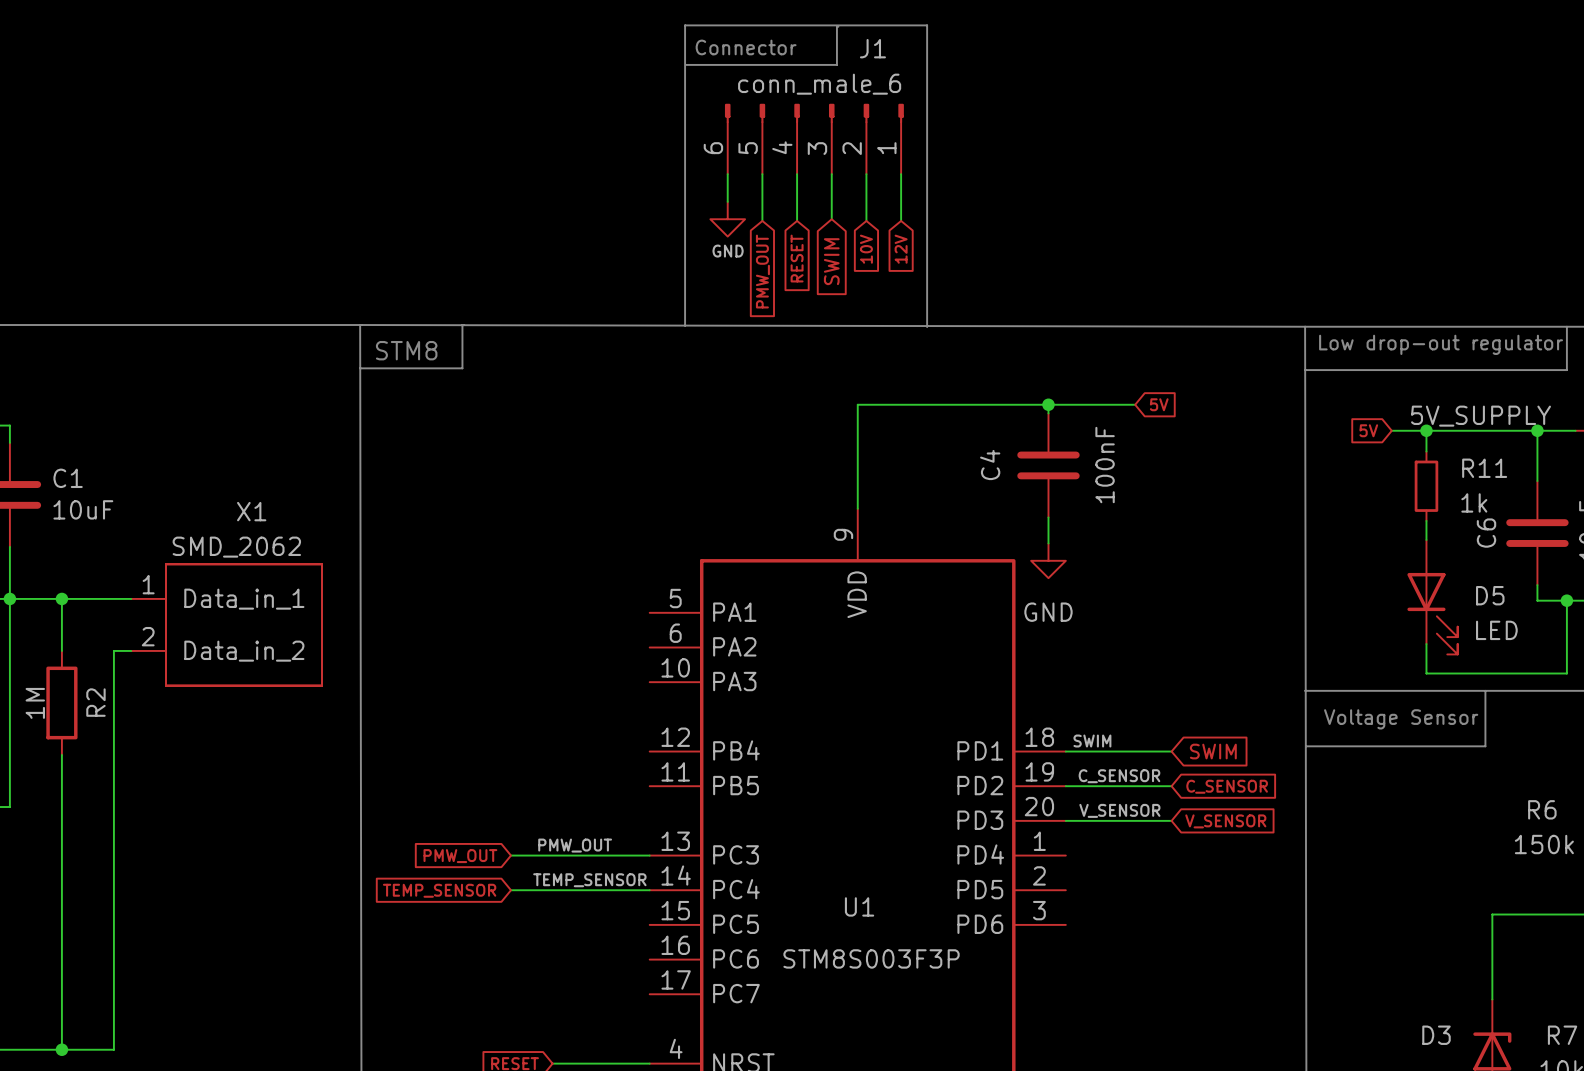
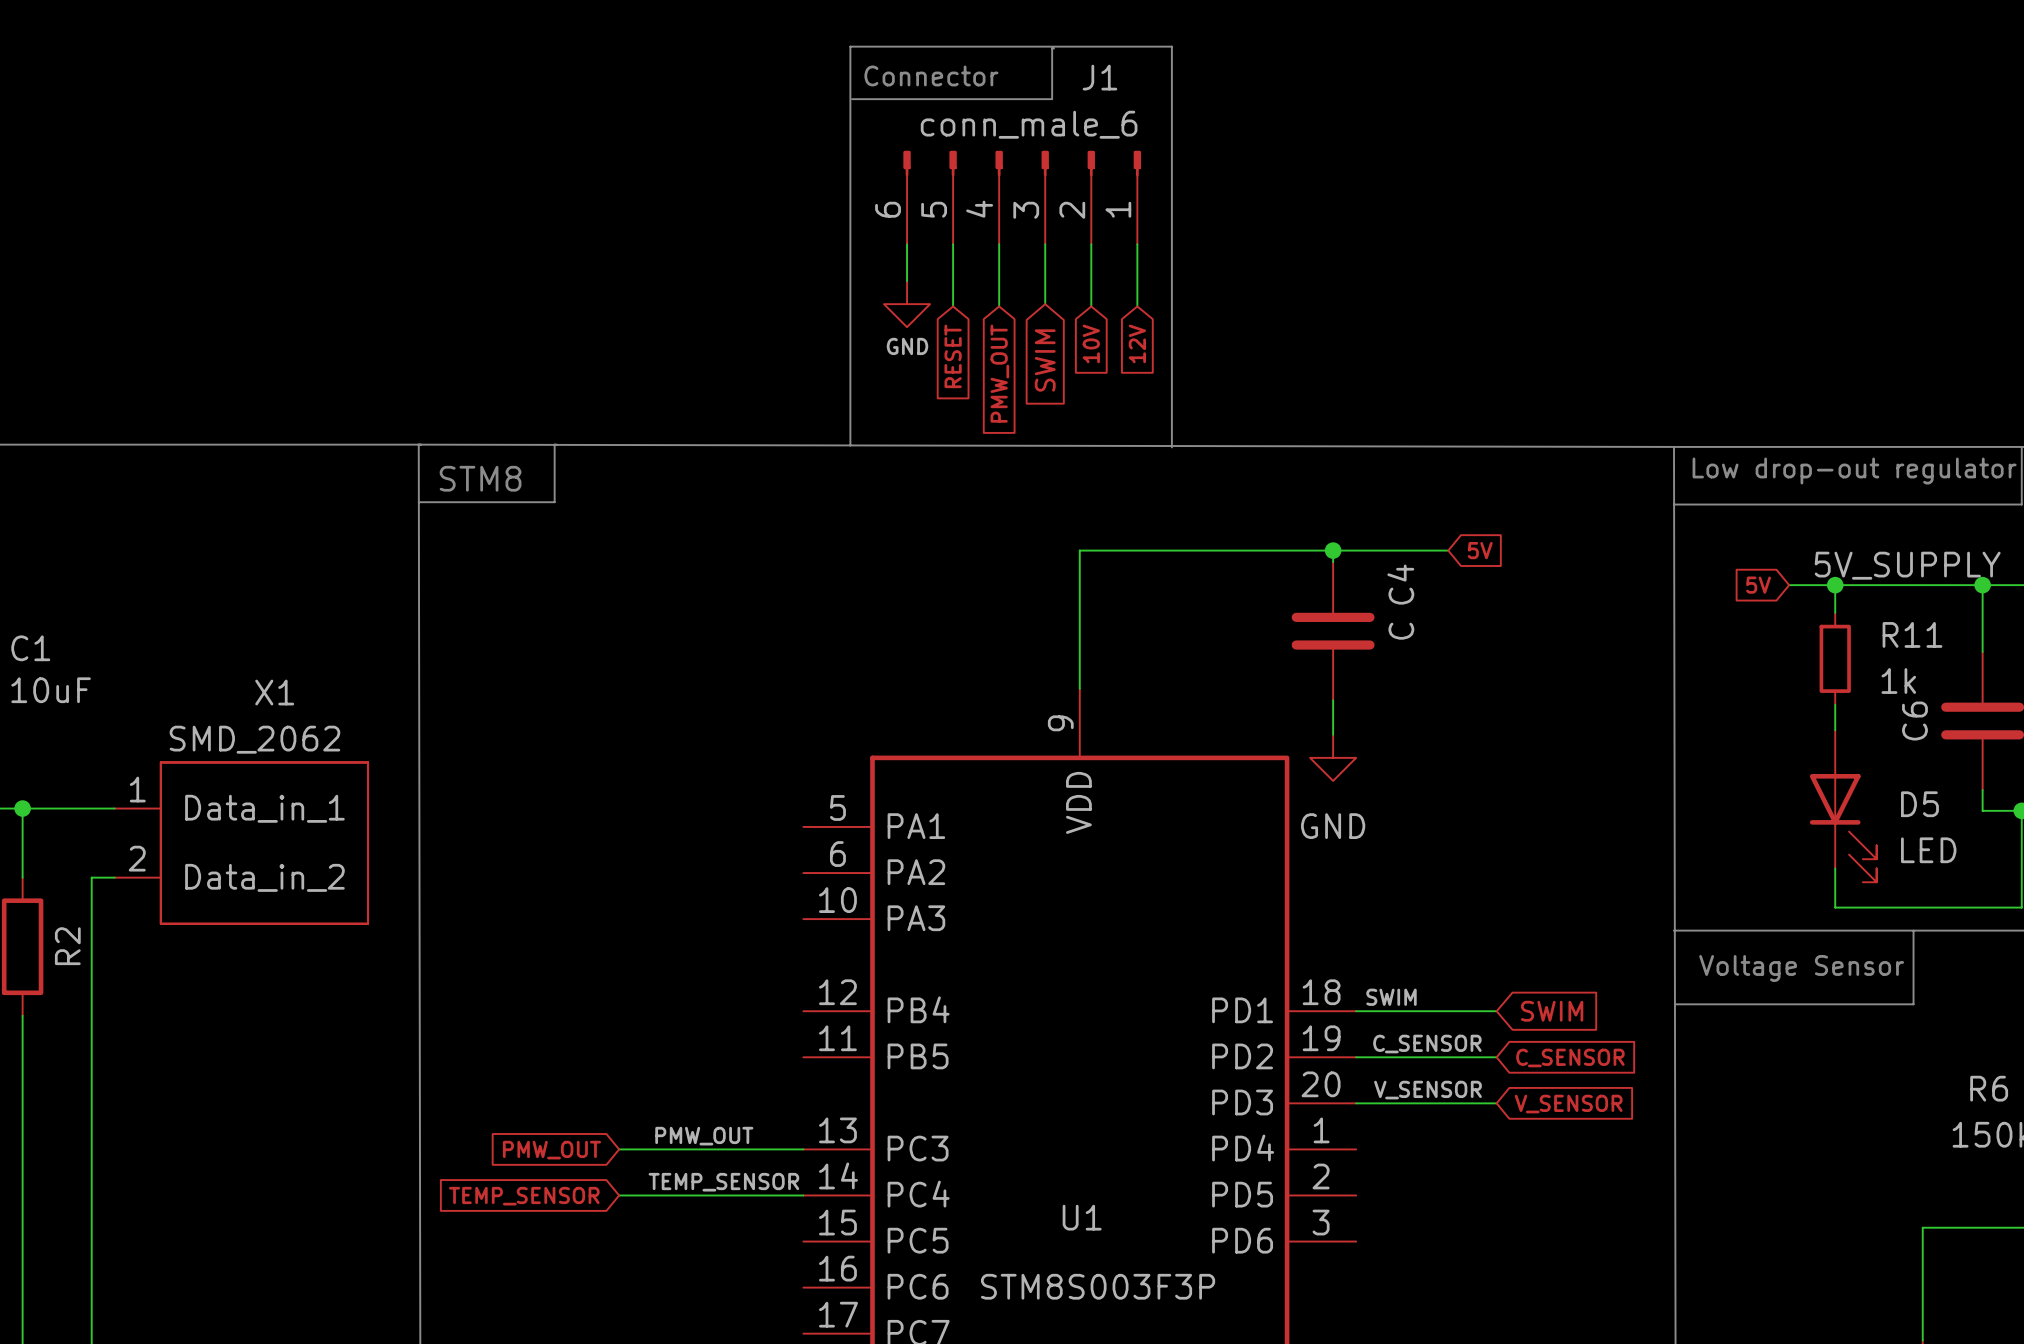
global label: RESET (797, 258) -> PMW_OUT (999, 373)
global label: PMW_OUT (762, 271) -> RESET (953, 356)
C4 name position: C4 (990, 465) -> C4 (1400, 584)
C4 value: 100nF (1105, 465) -> C (1401, 631)

